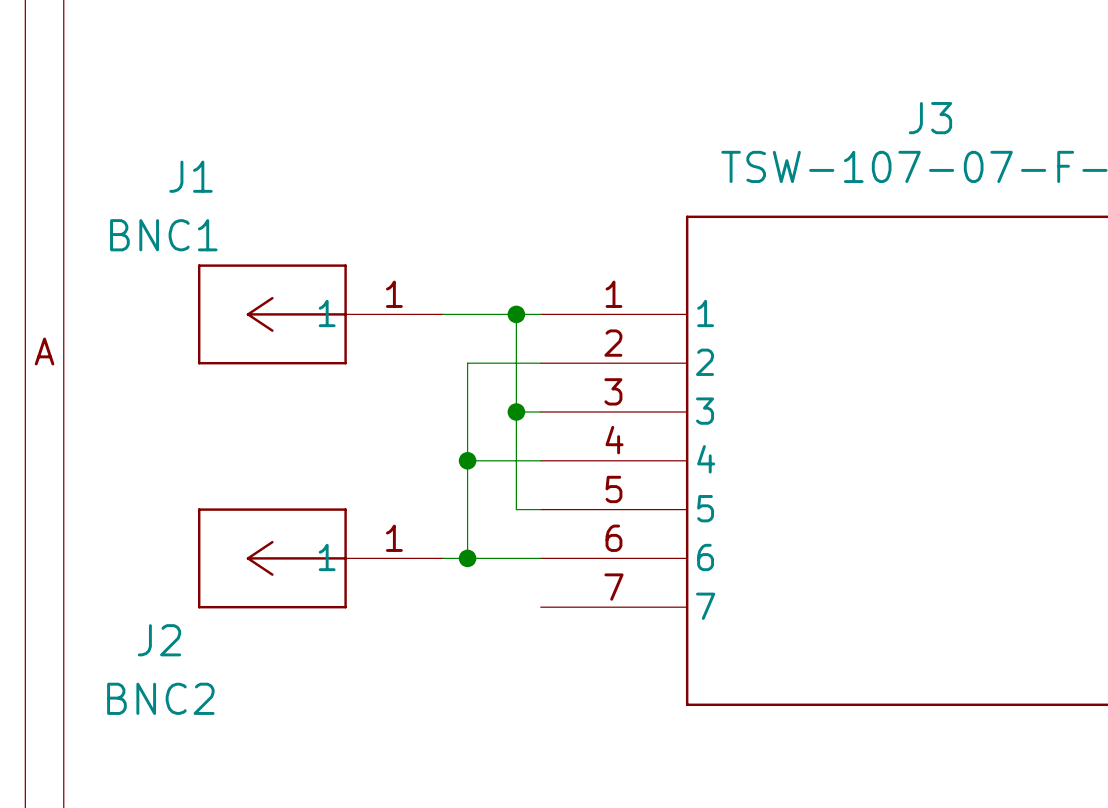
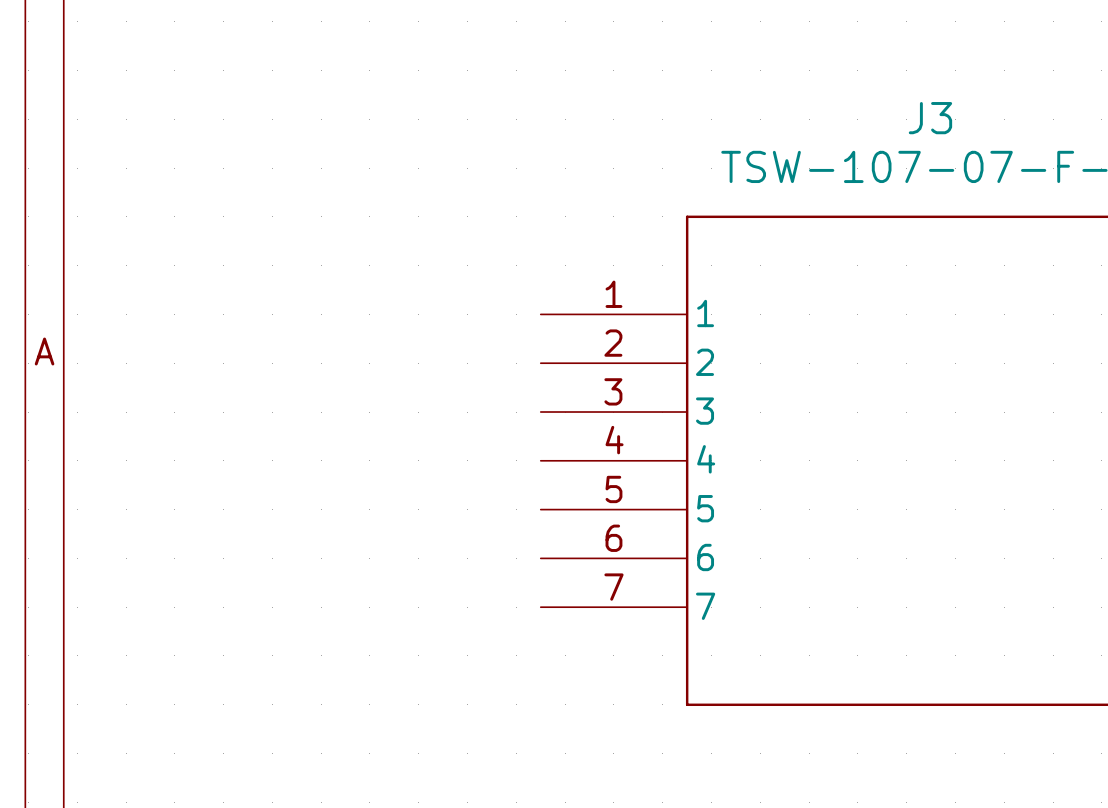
J1: BNC1 (320, 314) -> none
wire: (443, 314) (540, 314) -> none
wire: (516, 314) (516, 509) (540, 509) -> none
junction: (516, 314) -> none
wire: (540, 363) (467, 363) (467, 558) -> none
wire: (516, 412) (540, 412) -> none
junction: (516, 412) -> none
wire: (467, 460) (540, 460) -> none
junction: (467, 460) -> none
J2: BNC2 (320, 558) -> none
wire: (443, 558) (540, 558) -> none
junction: (467, 558) -> none

